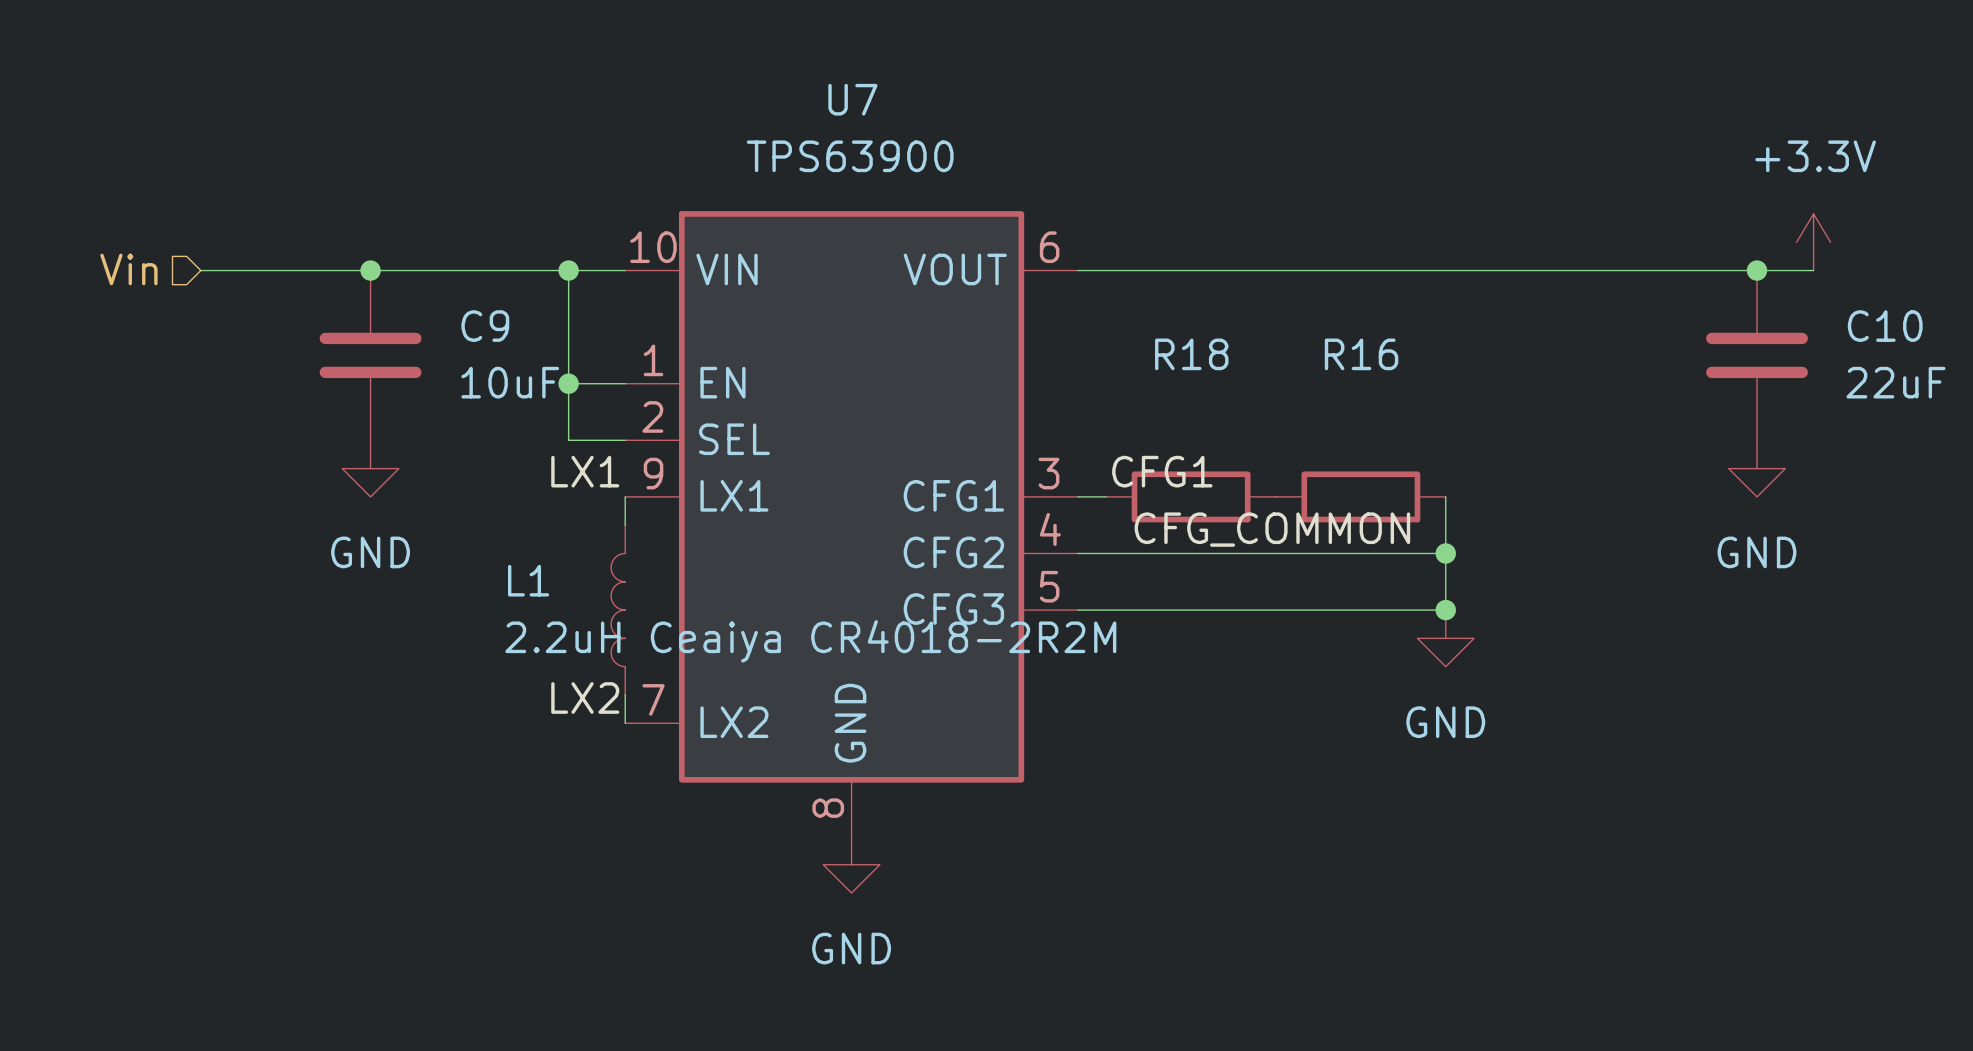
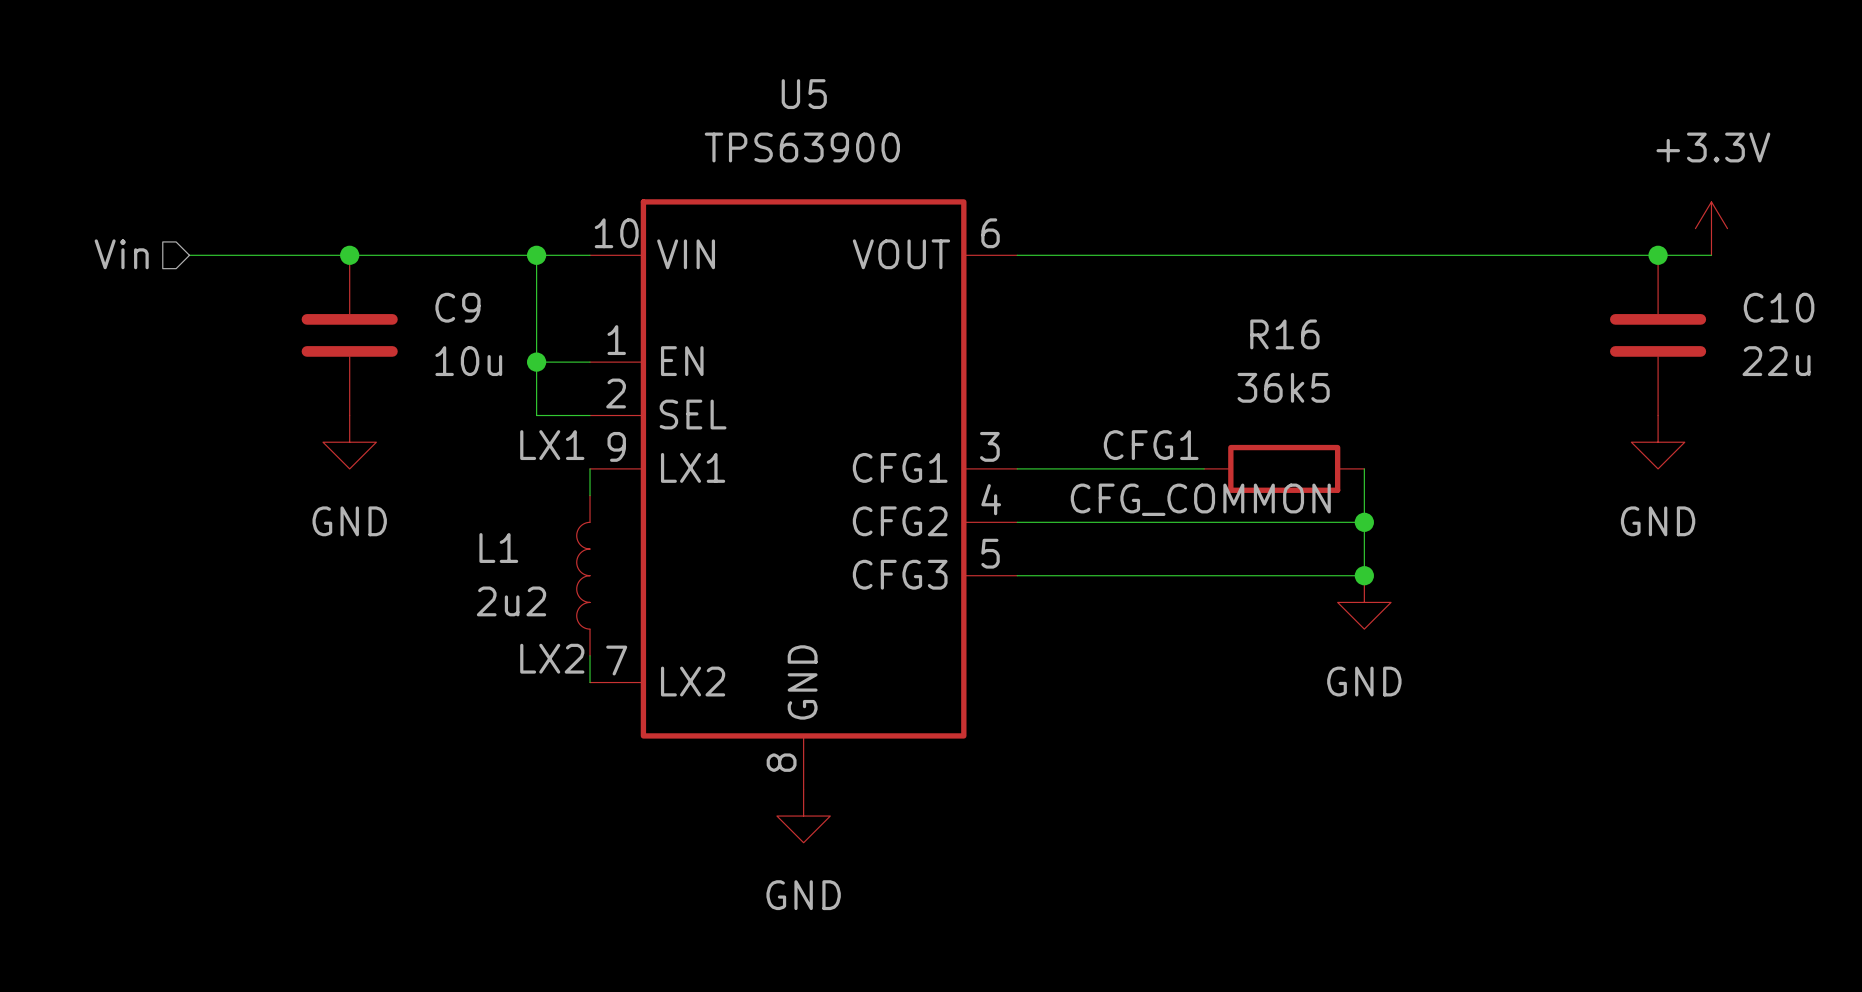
U7 name: U7 (852, 99) -> U5 (804, 94)
C9 value: 10uF (510, 382) -> 10u (468, 361)
C10 value: 22uF (1895, 382) -> 22u (1776, 361)
R16 value: none -> 36k5 (1283, 387)
label position: CFG1 (1162, 471) -> CFG1 (1151, 445)
wire: none -> (1043, 468) (1204, 468)
R18: (1191, 496) -> none
L1 value: 2.2uH Ceaiya CR4018-2R2M (810, 641) -> 2u2 (511, 601)

